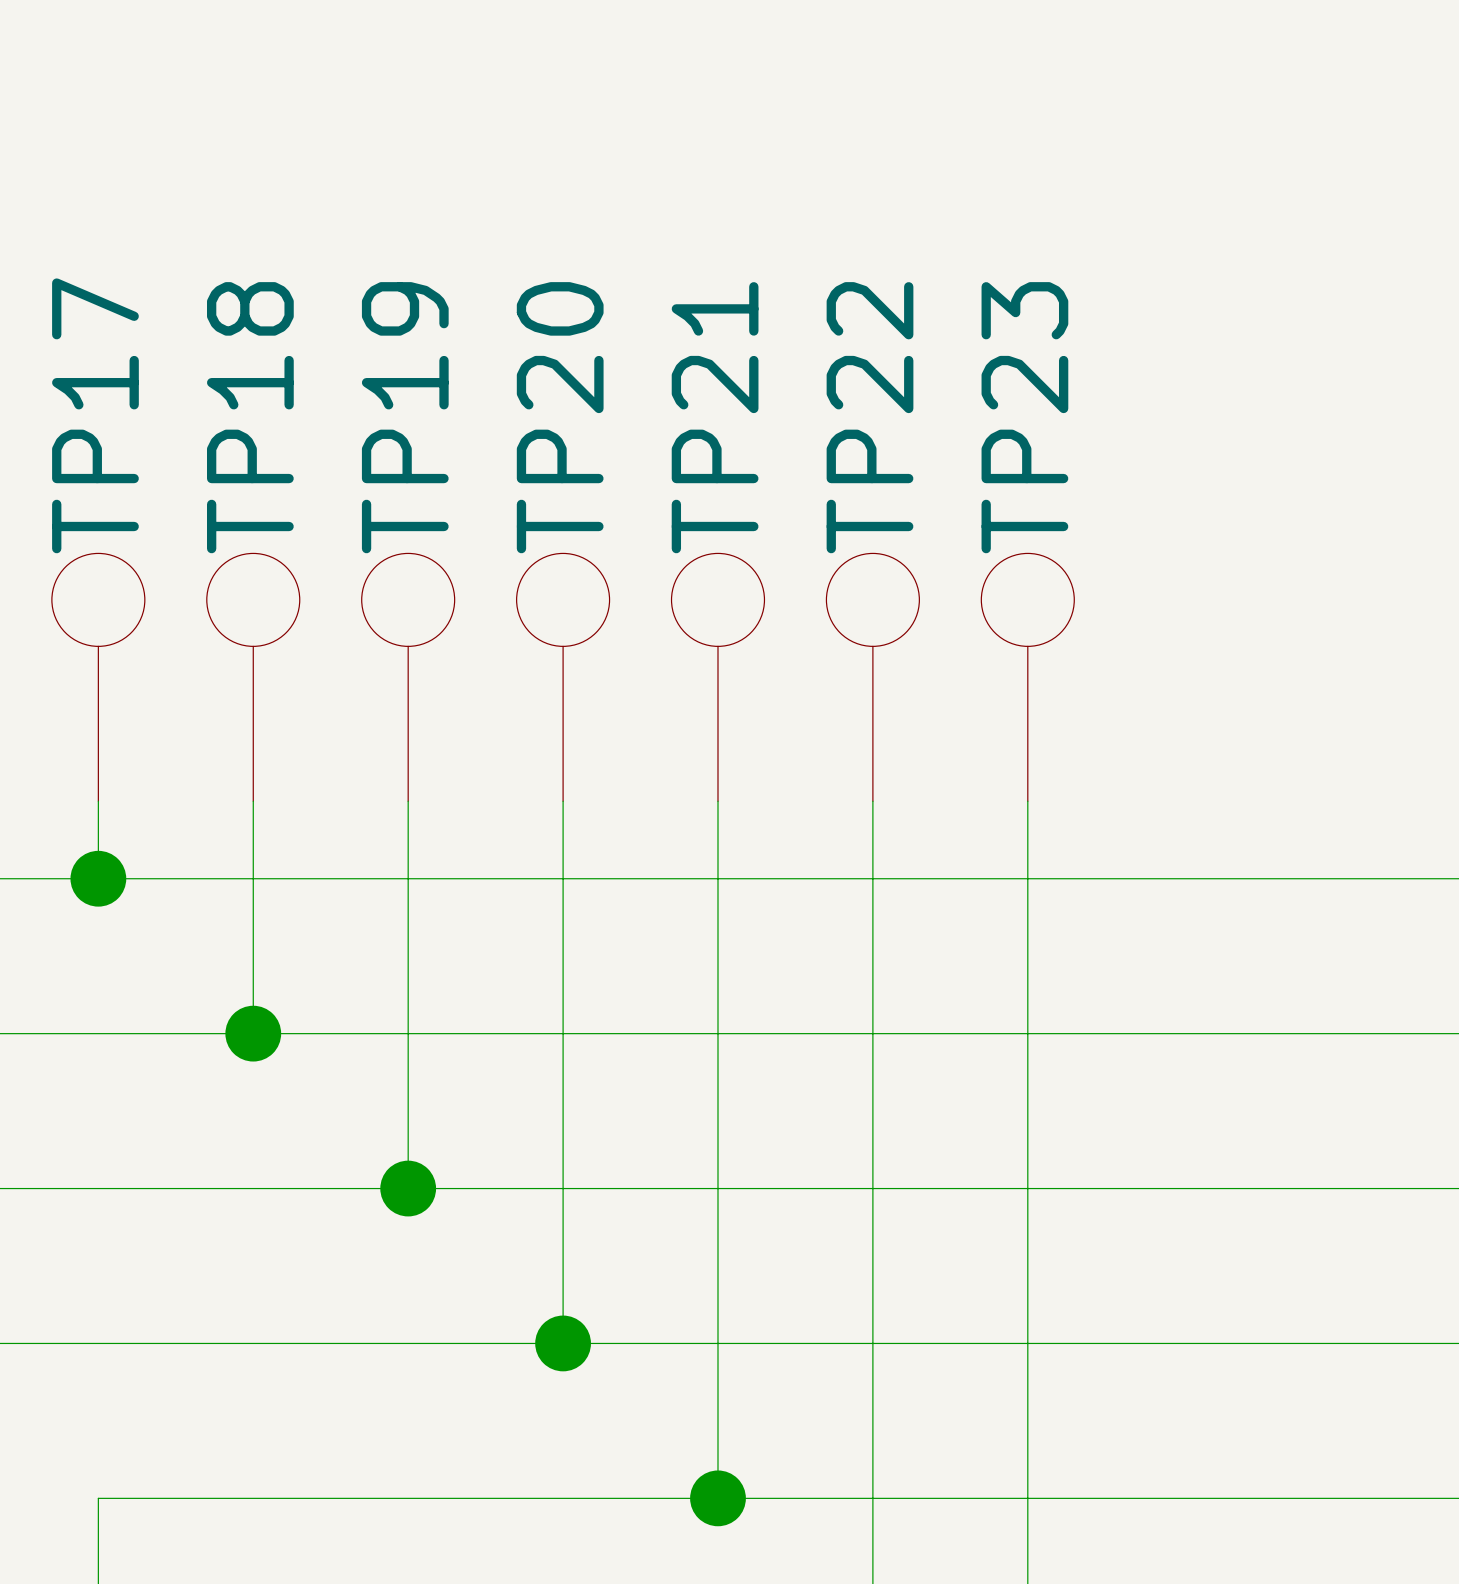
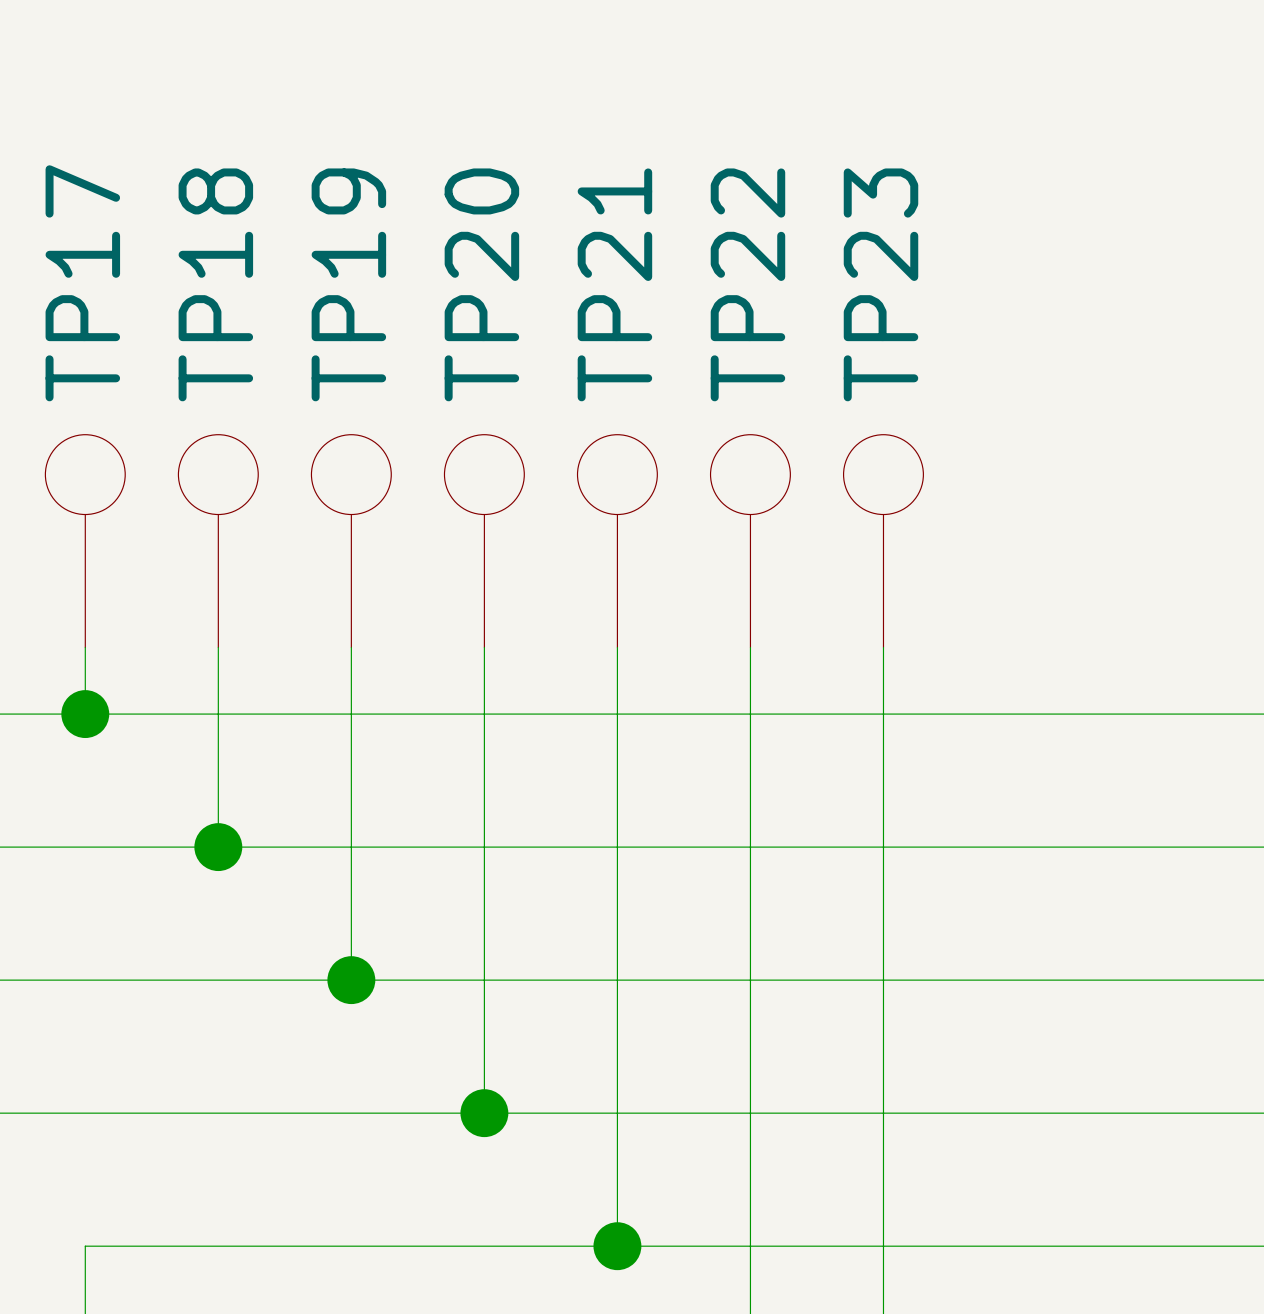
TP17 name position: TP17 (95, 415) -> TP17 (82, 283)
TP18 name position: TP18 (250, 417) -> TP18 (215, 284)
TP19 name position: TP19 (405, 417) -> TP19 (348, 284)
TP20 name position: TP20 (560, 417) -> TP20 (481, 284)
TP21 name position: TP21 (715, 417) -> TP21 (614, 284)
TP22 name position: TP22 (870, 417) -> TP22 (747, 284)
TP23 name position: TP23 (1024, 417) -> TP23 (880, 284)

